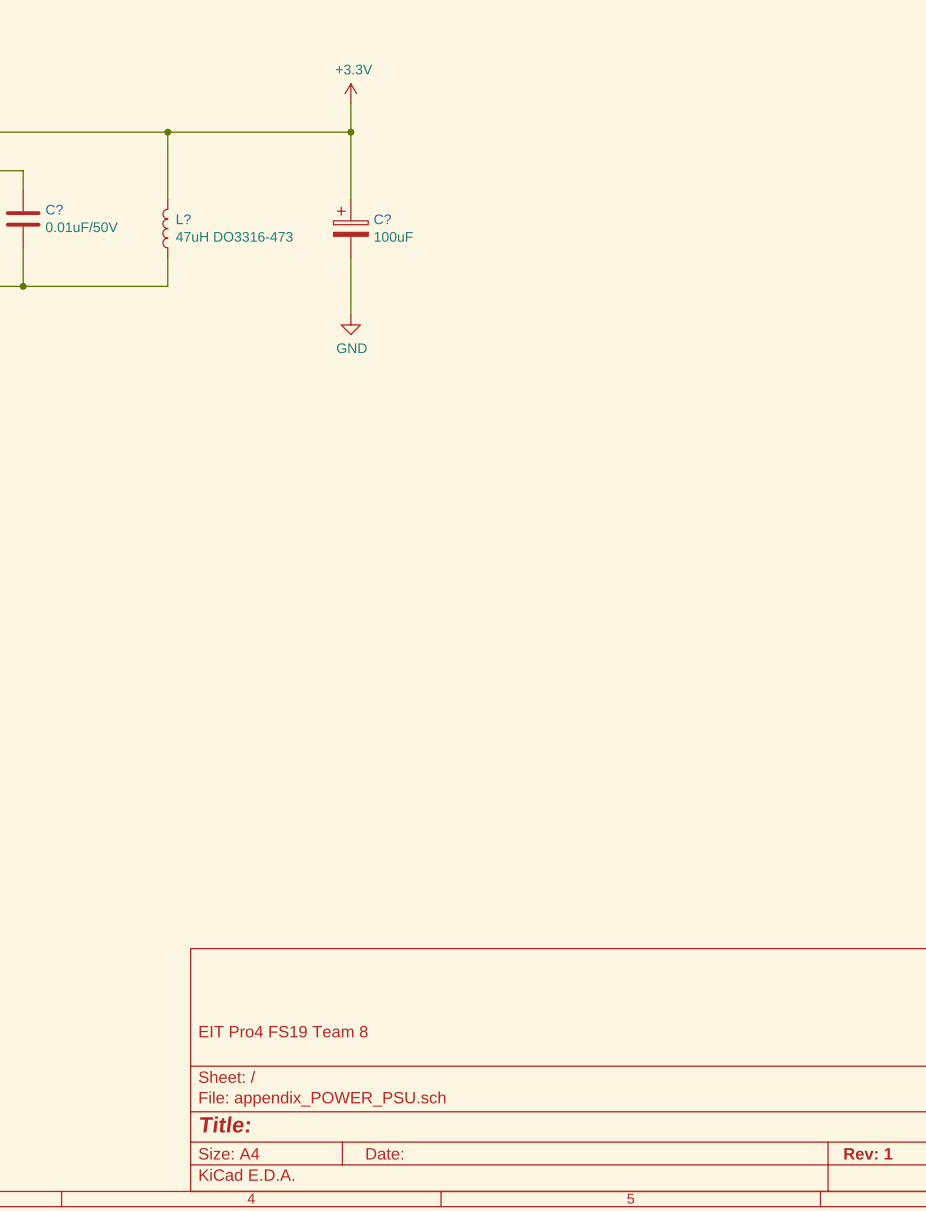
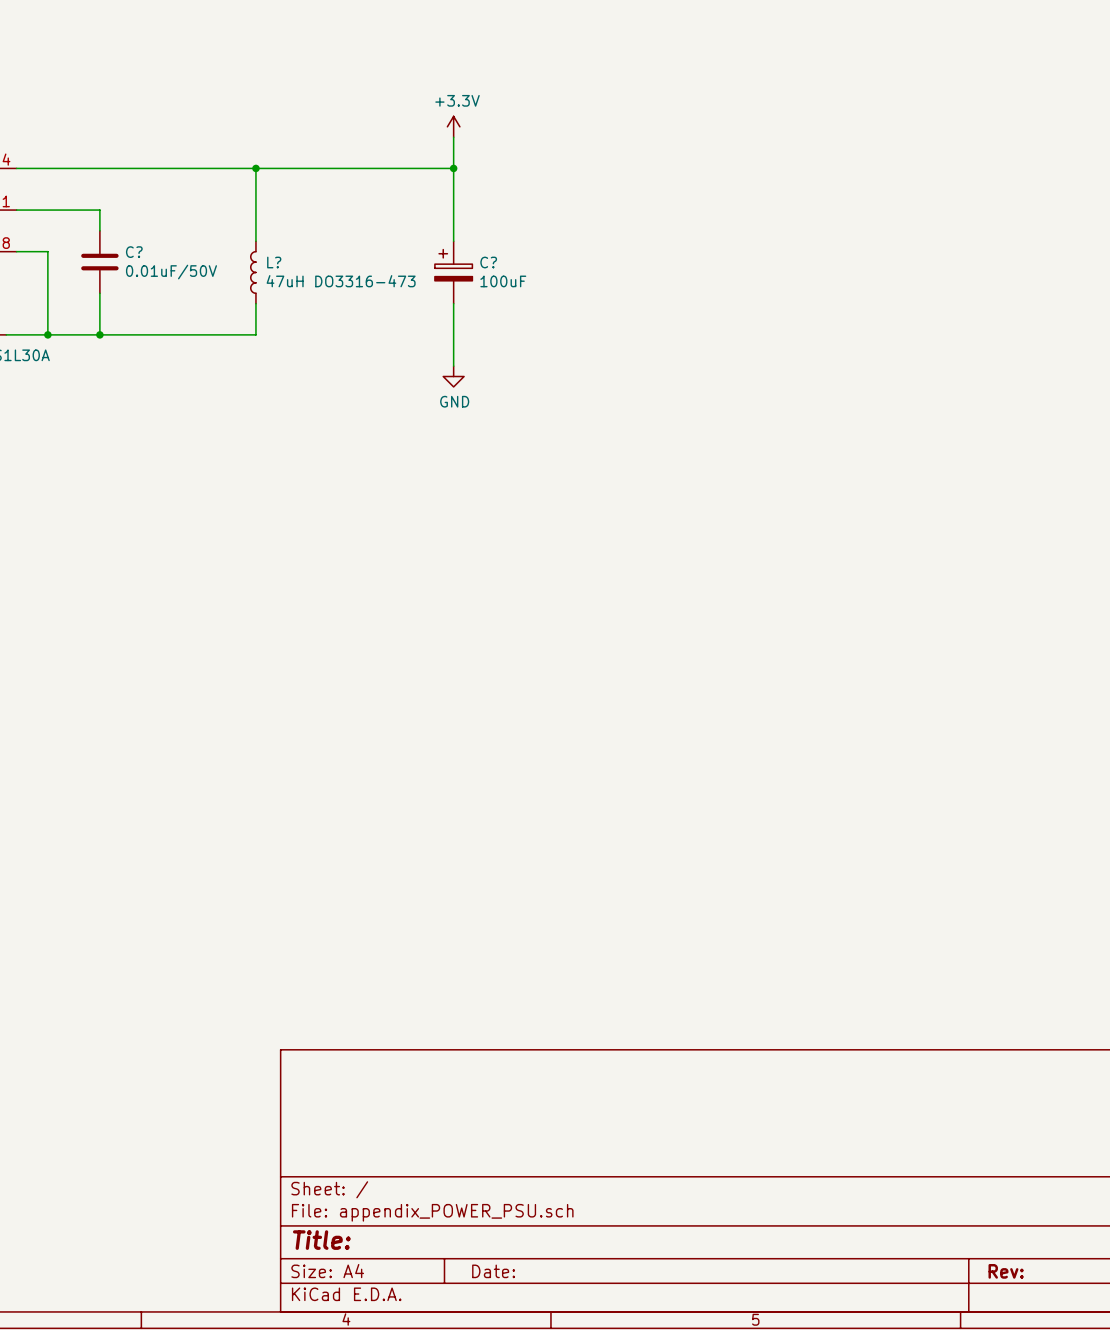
title block: EIT Pro4 FS19 Team 8 (283, 1031) -> none
title block: Rev: 1 (868, 1153) -> Rev: (1006, 1271)

